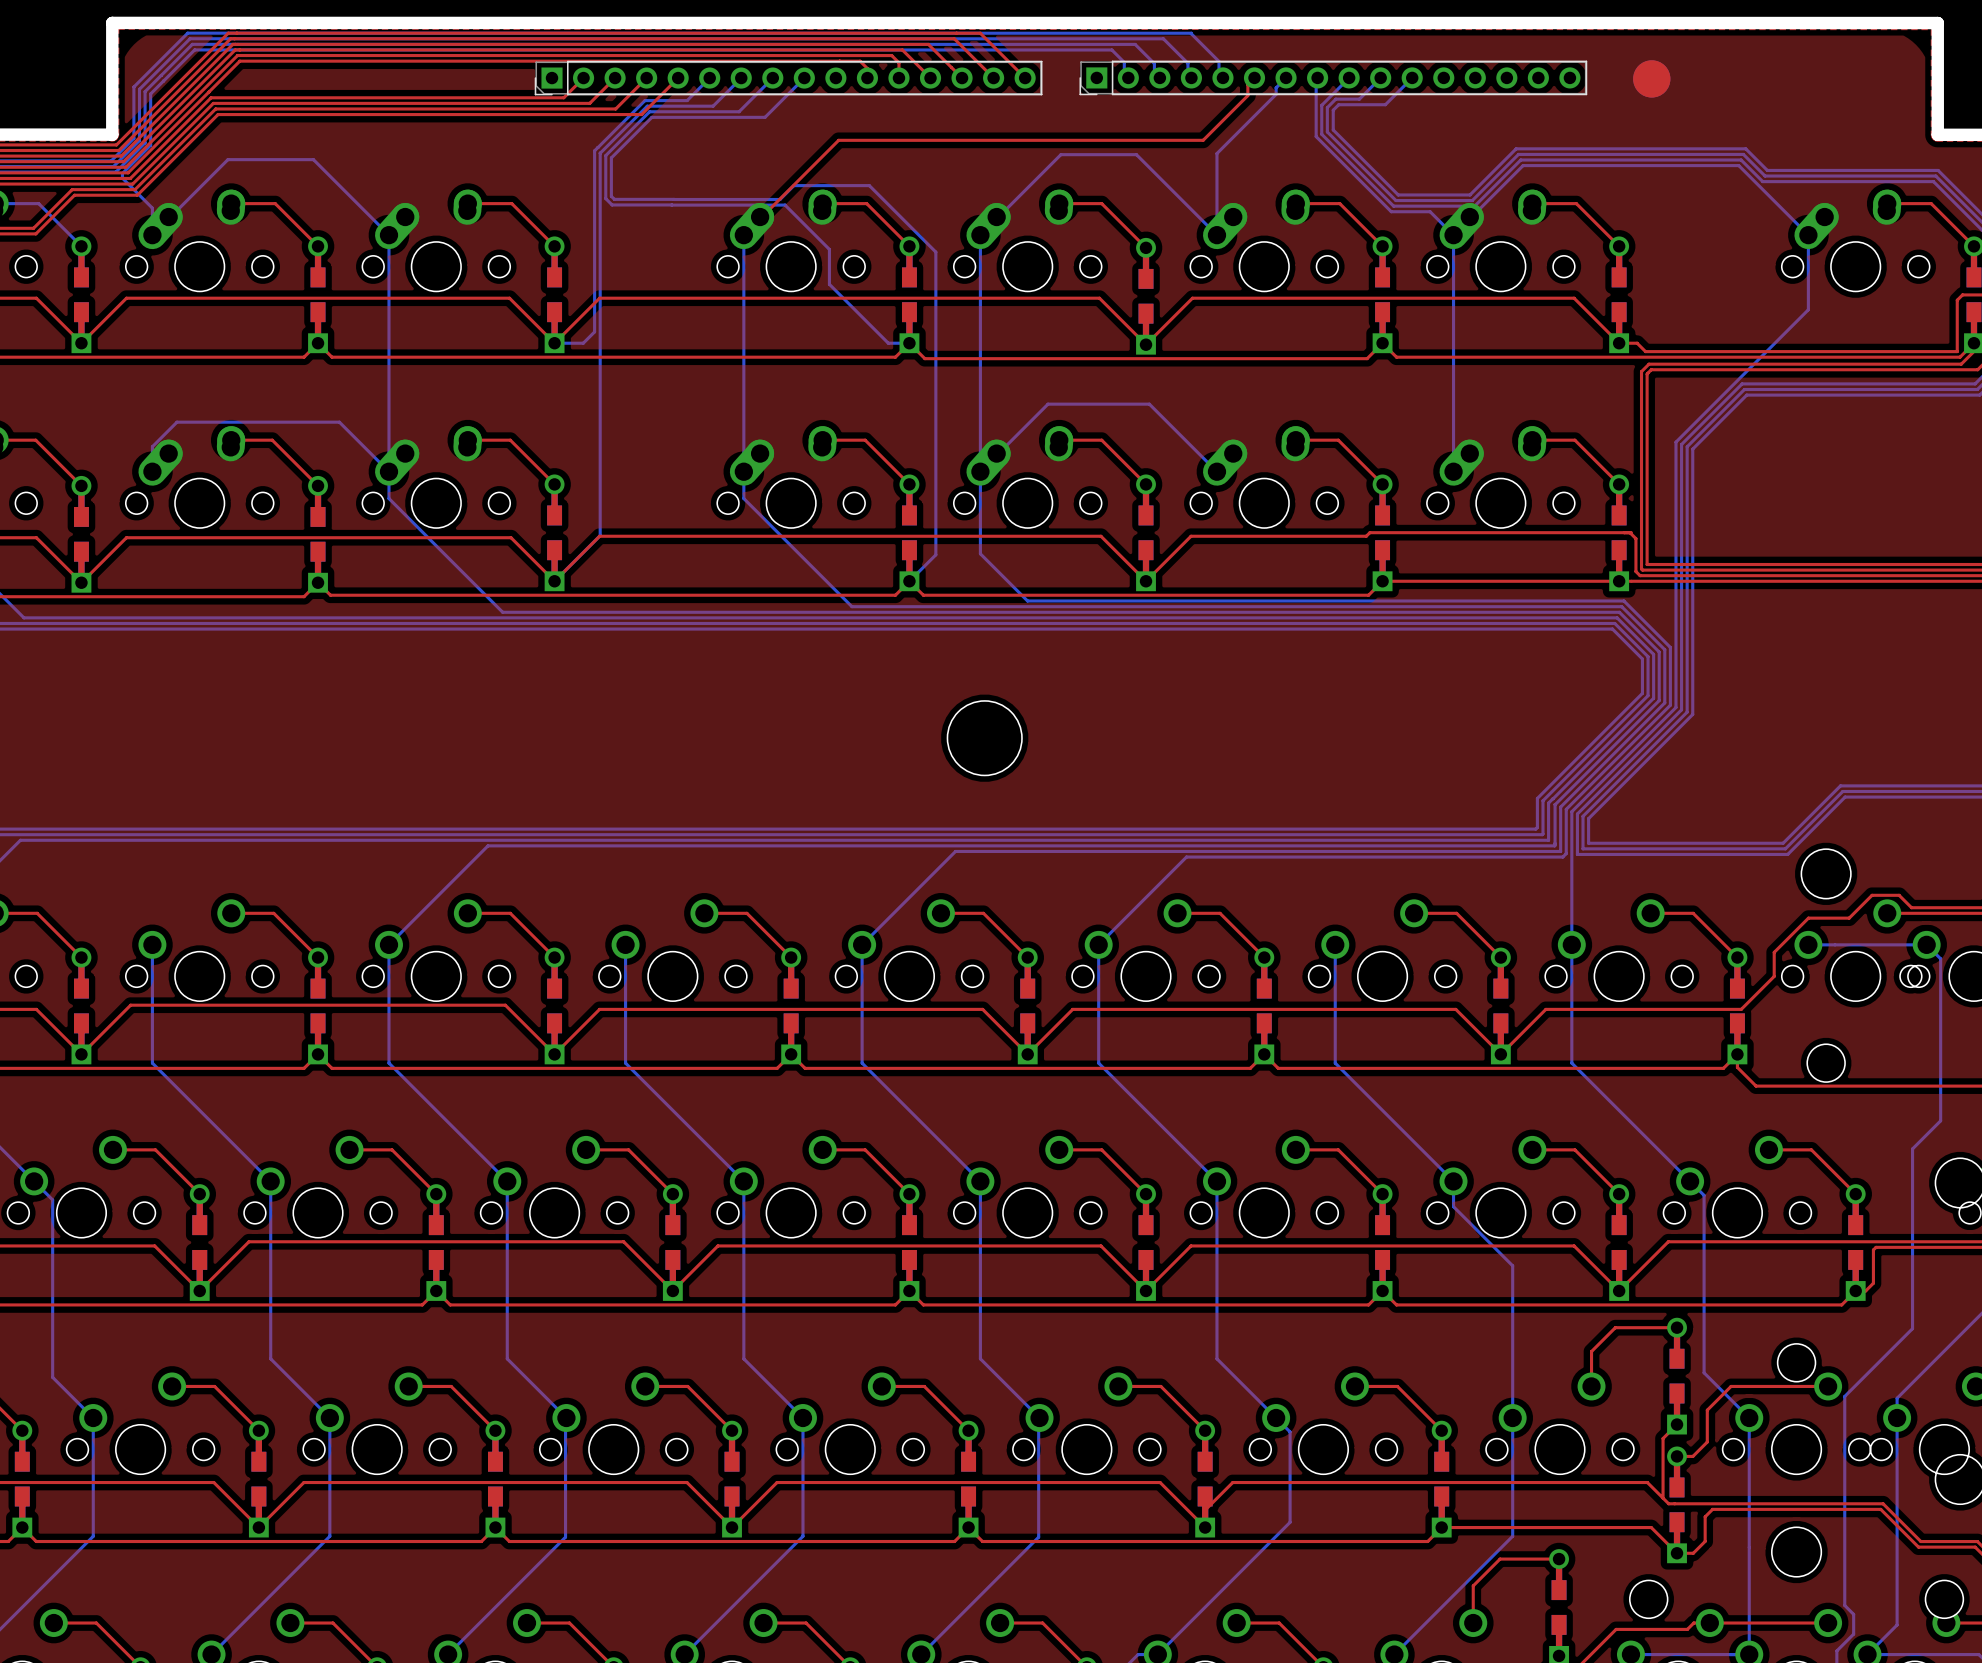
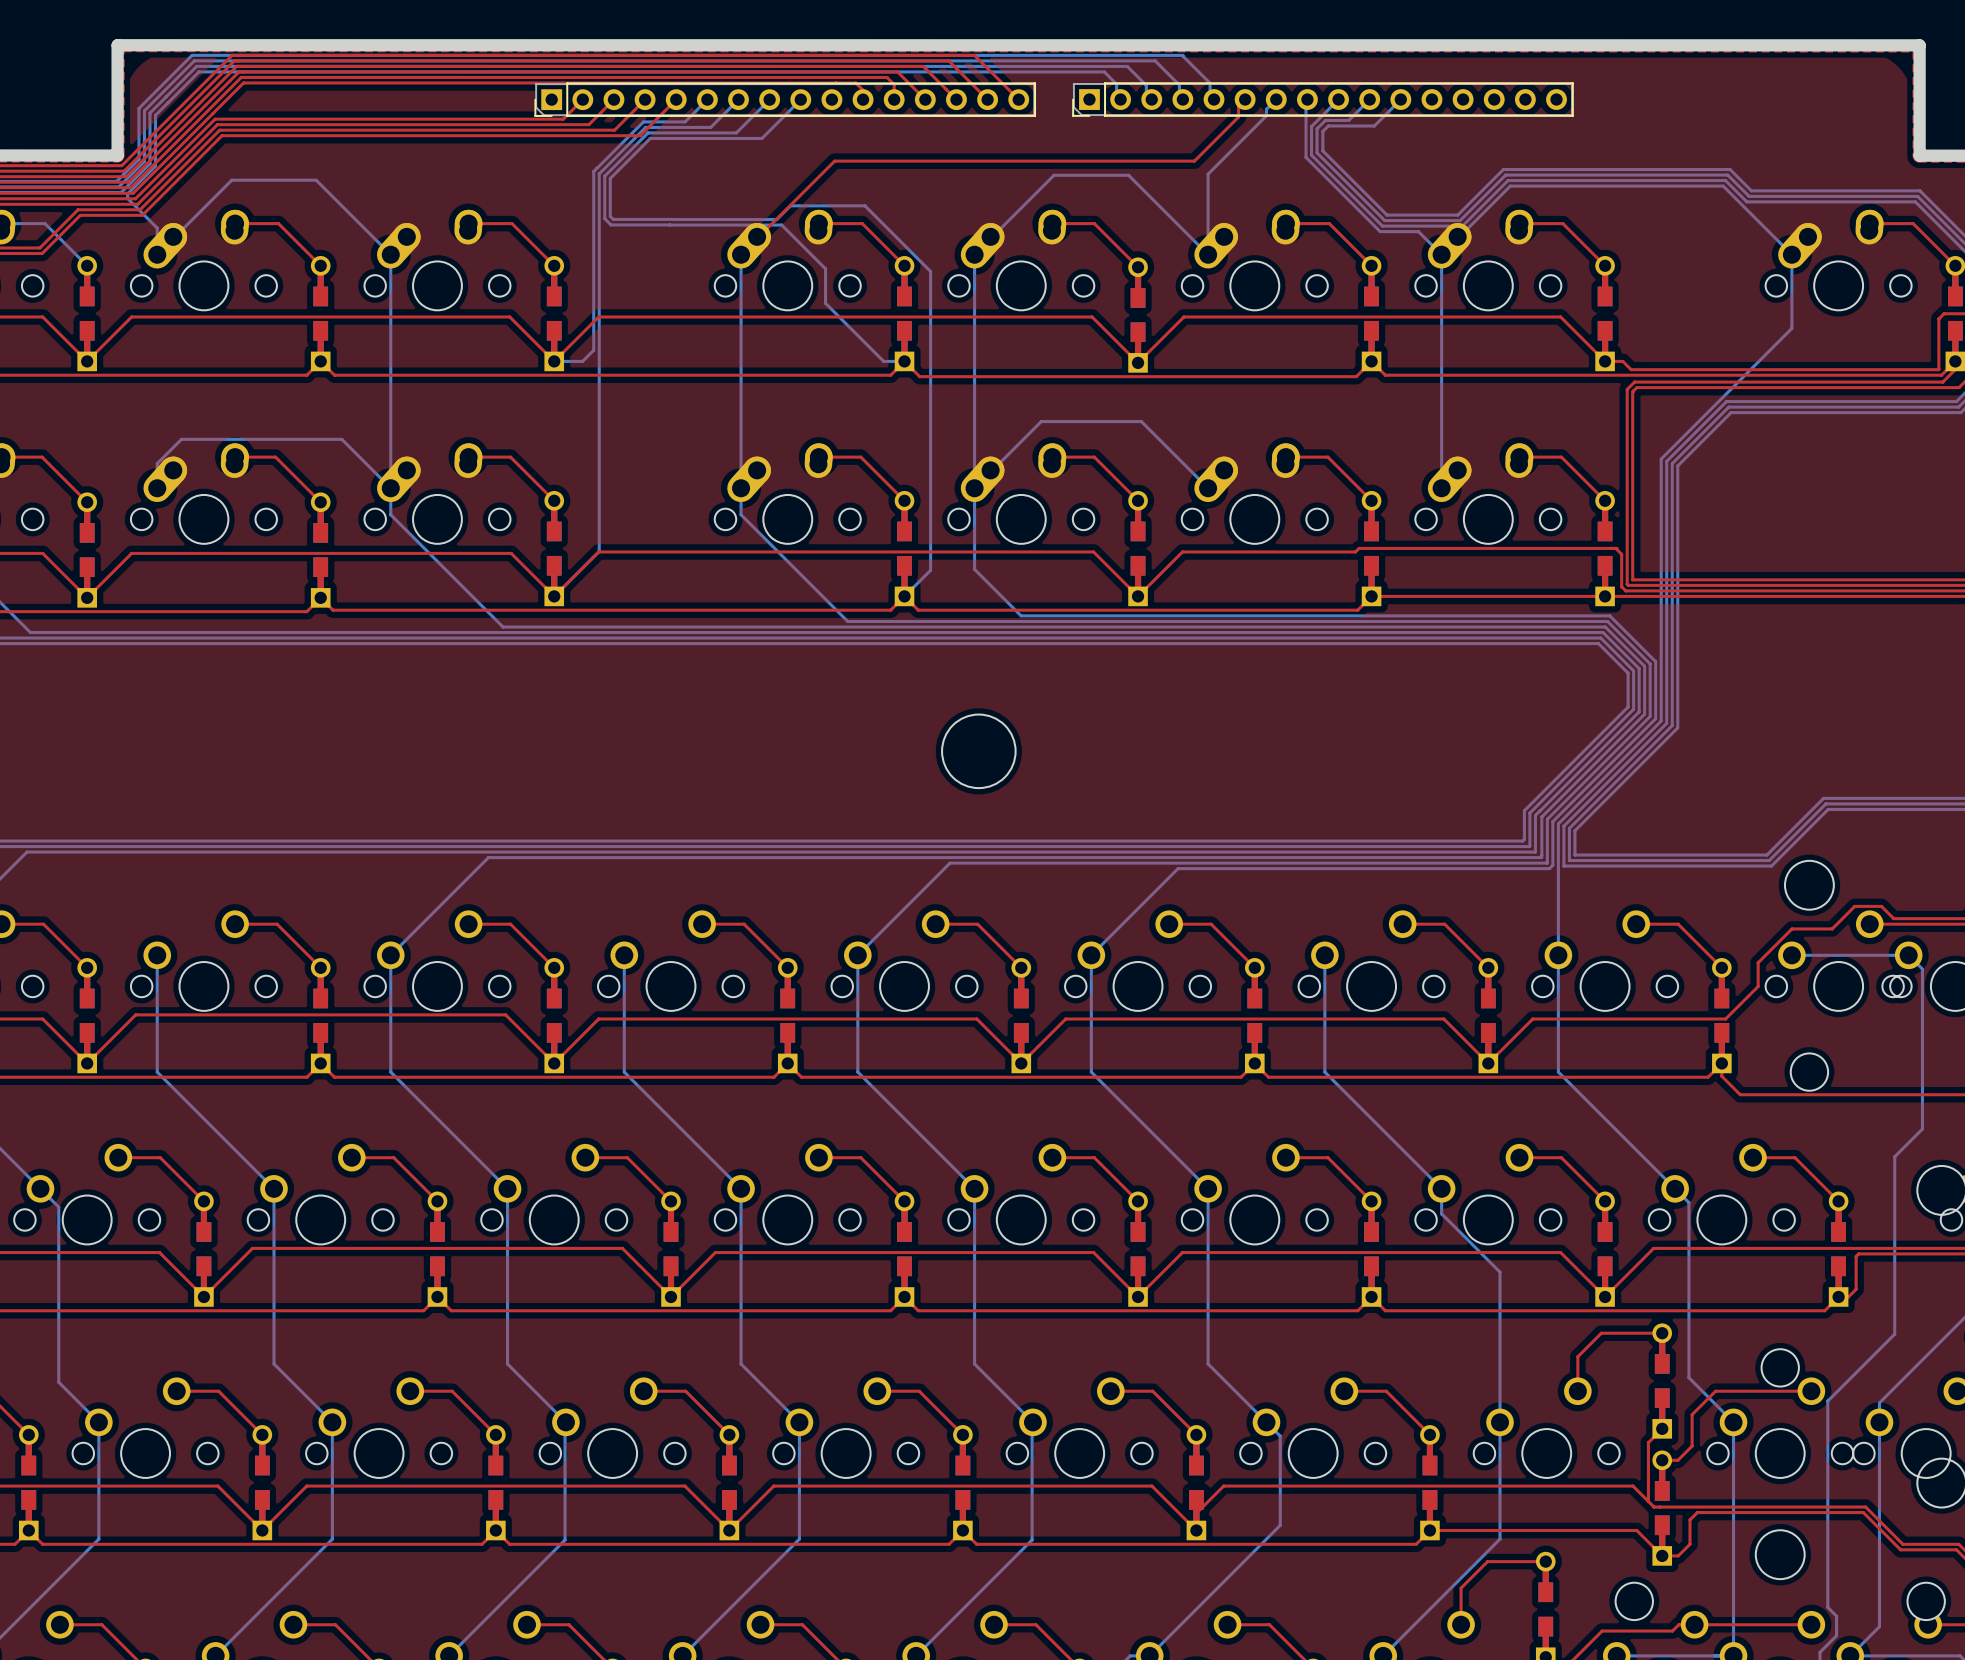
part: (1651, 78) -> none

